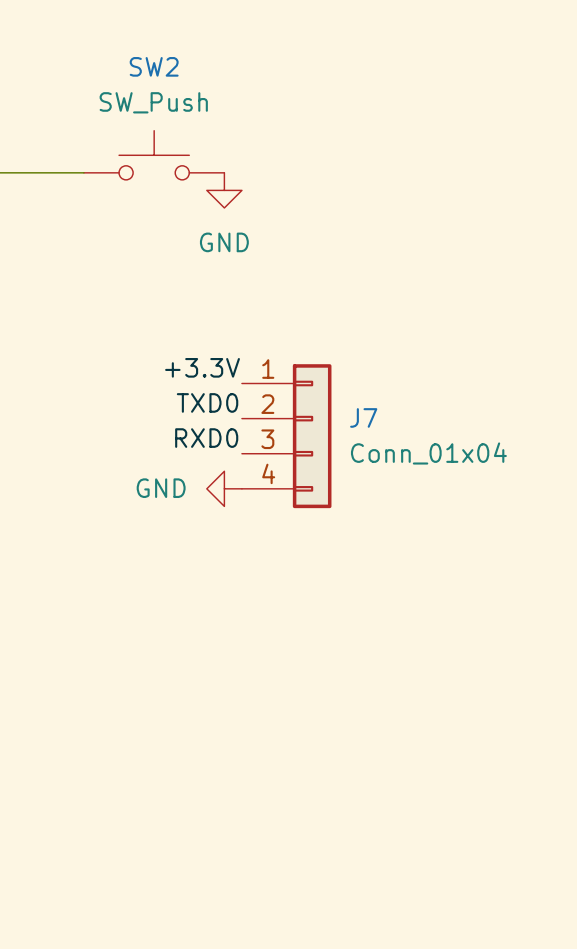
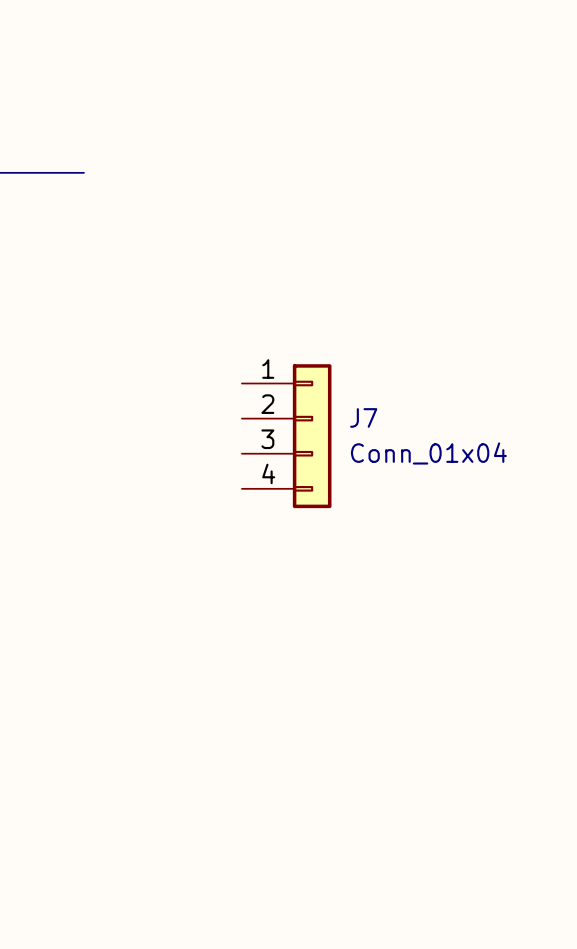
SW2: SW_Push (154, 155) -> none
power symbol: GND (224, 190) -> none
label: +3.3V (202, 367) -> none
label: TXD0 (207, 402) -> none
label: RXD0 (206, 438) -> none
power symbol: GND (224, 488) -> none

